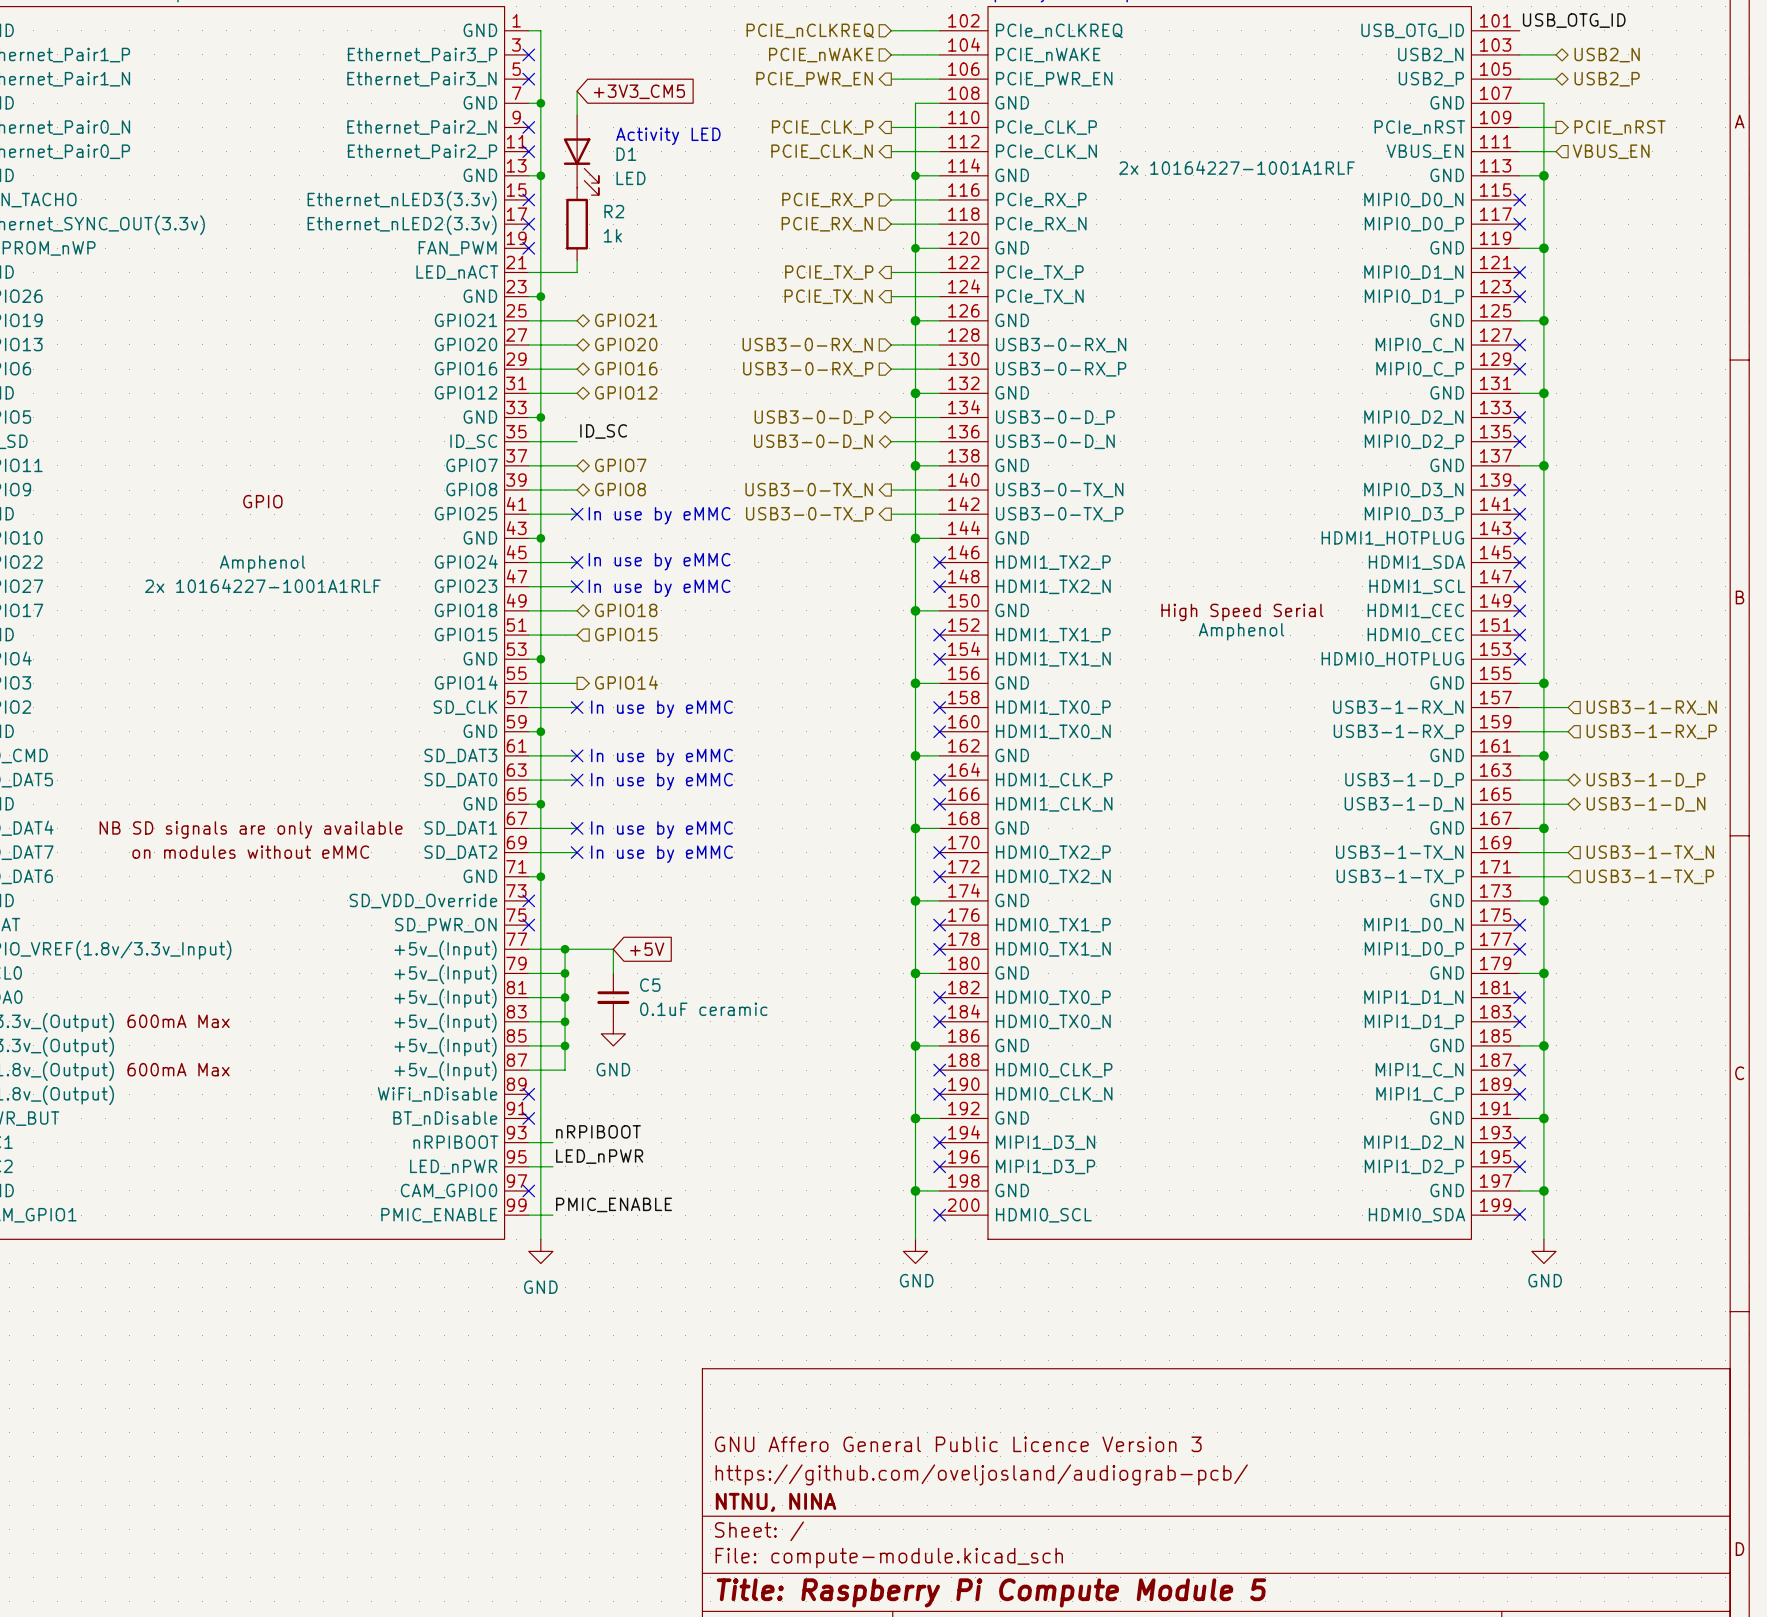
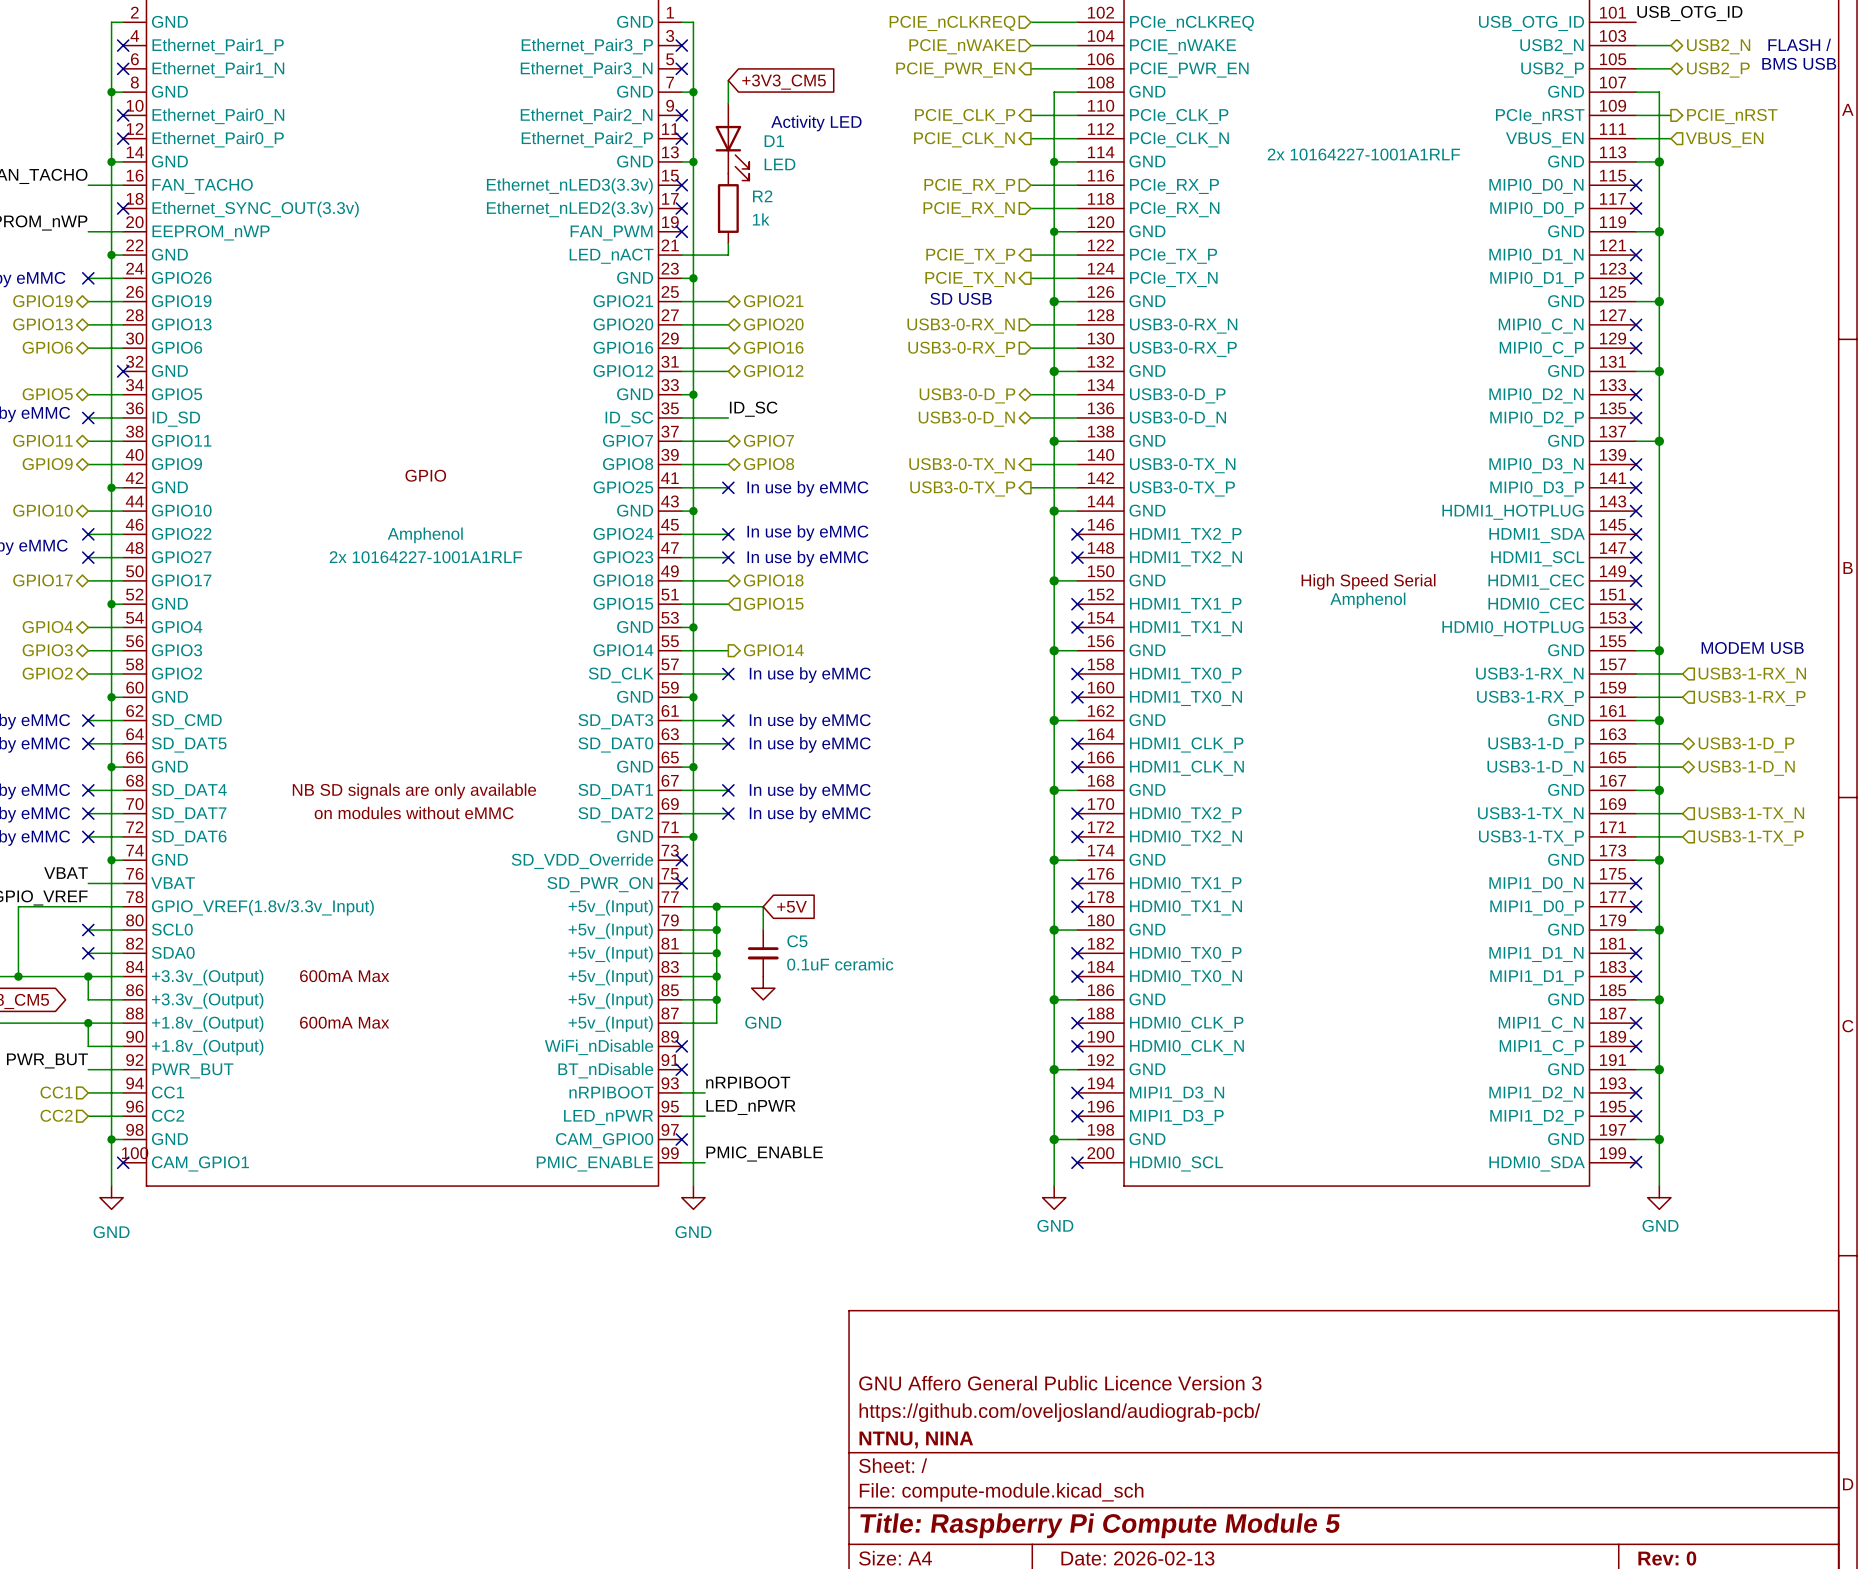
text: none -> FLASH / (1799, 44)
text: none -> BMS USB (1799, 63)
text: none -> SD USB (961, 298)
text: none -> MODEM USB (1752, 648)

